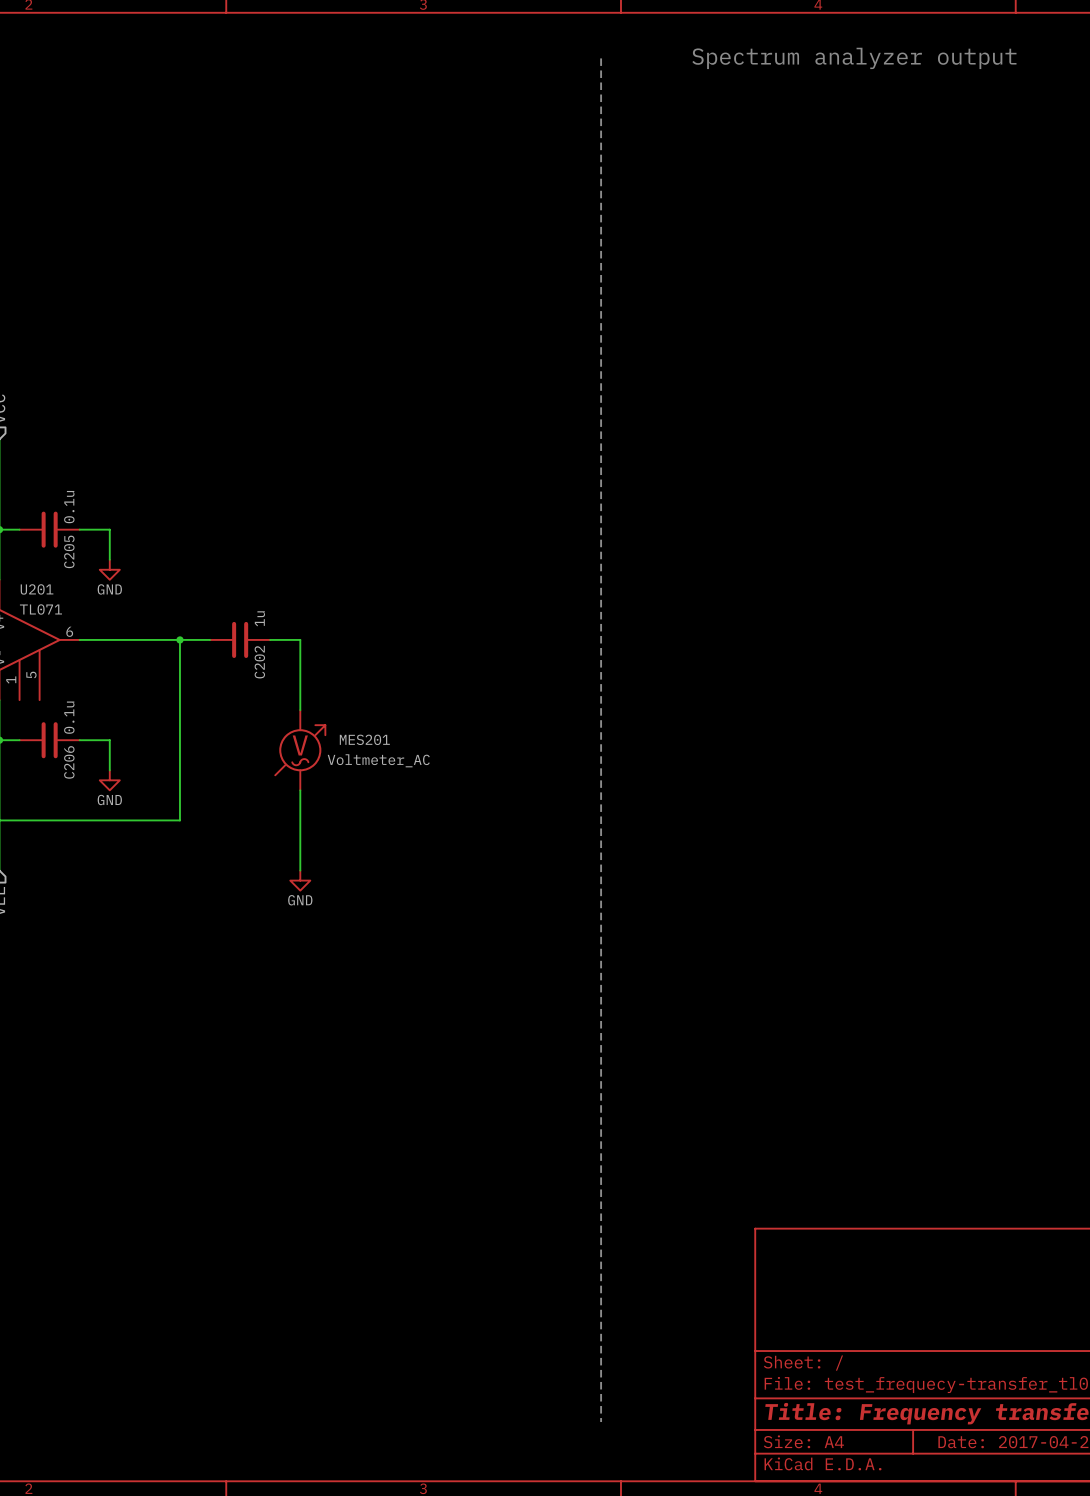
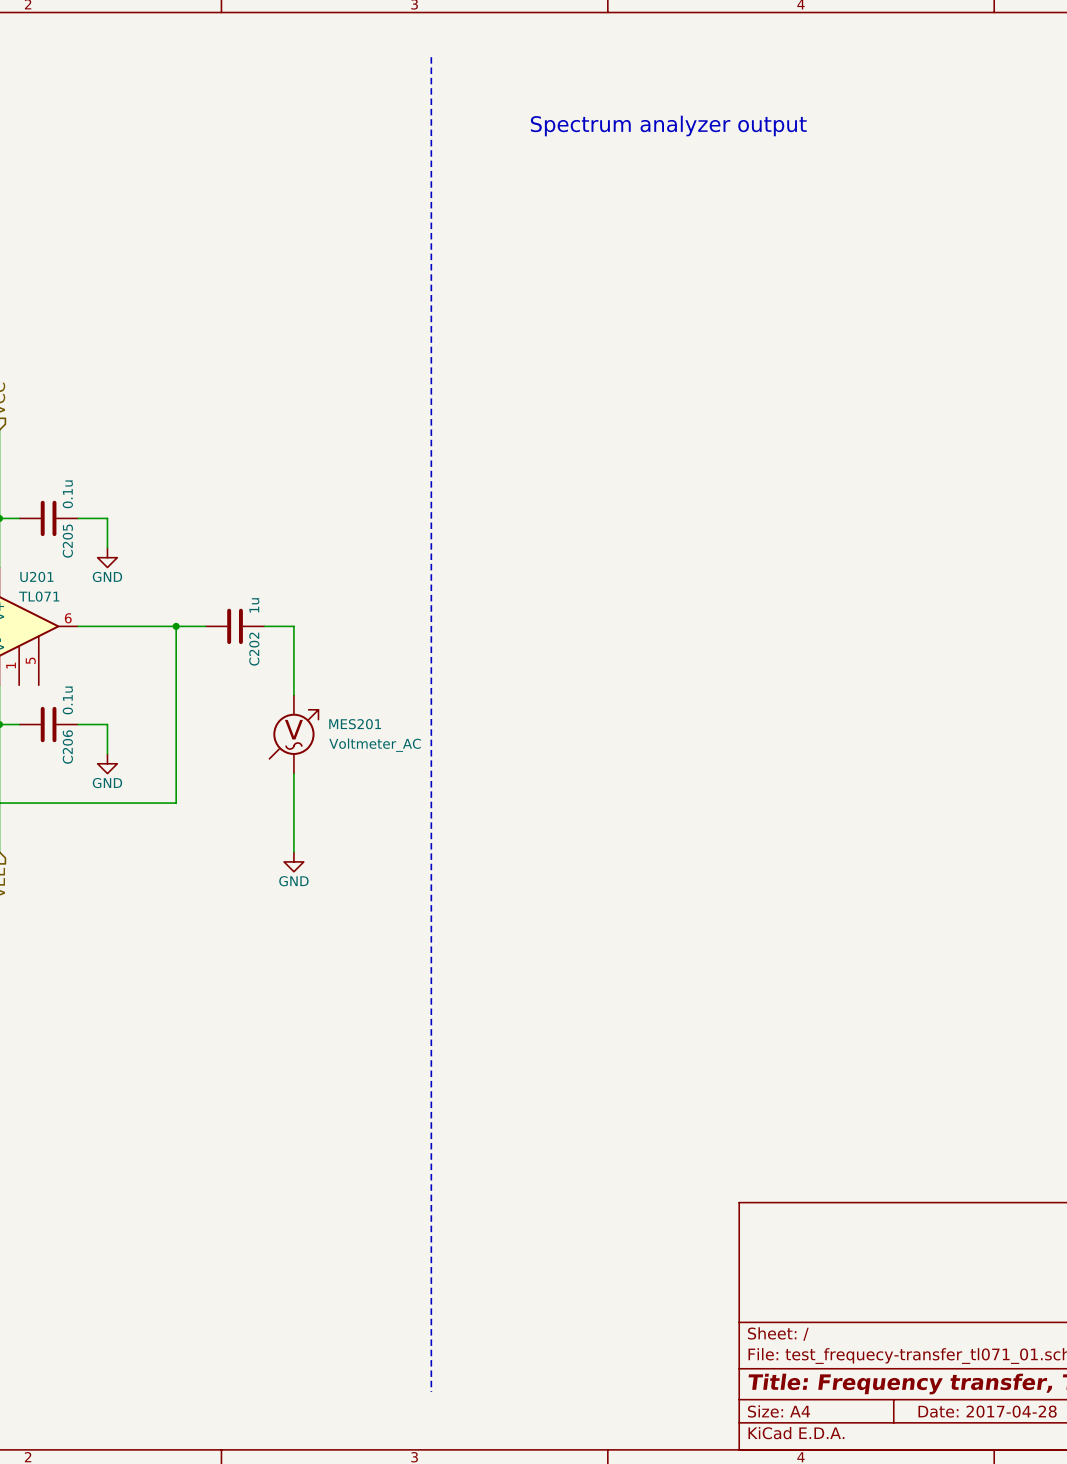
line: (601, 58) (601, 1422) -> (431, 57) (431, 1391)
text position: Spectrum analyzer output (854, 58) -> Spectrum analyzer output (668, 125)

